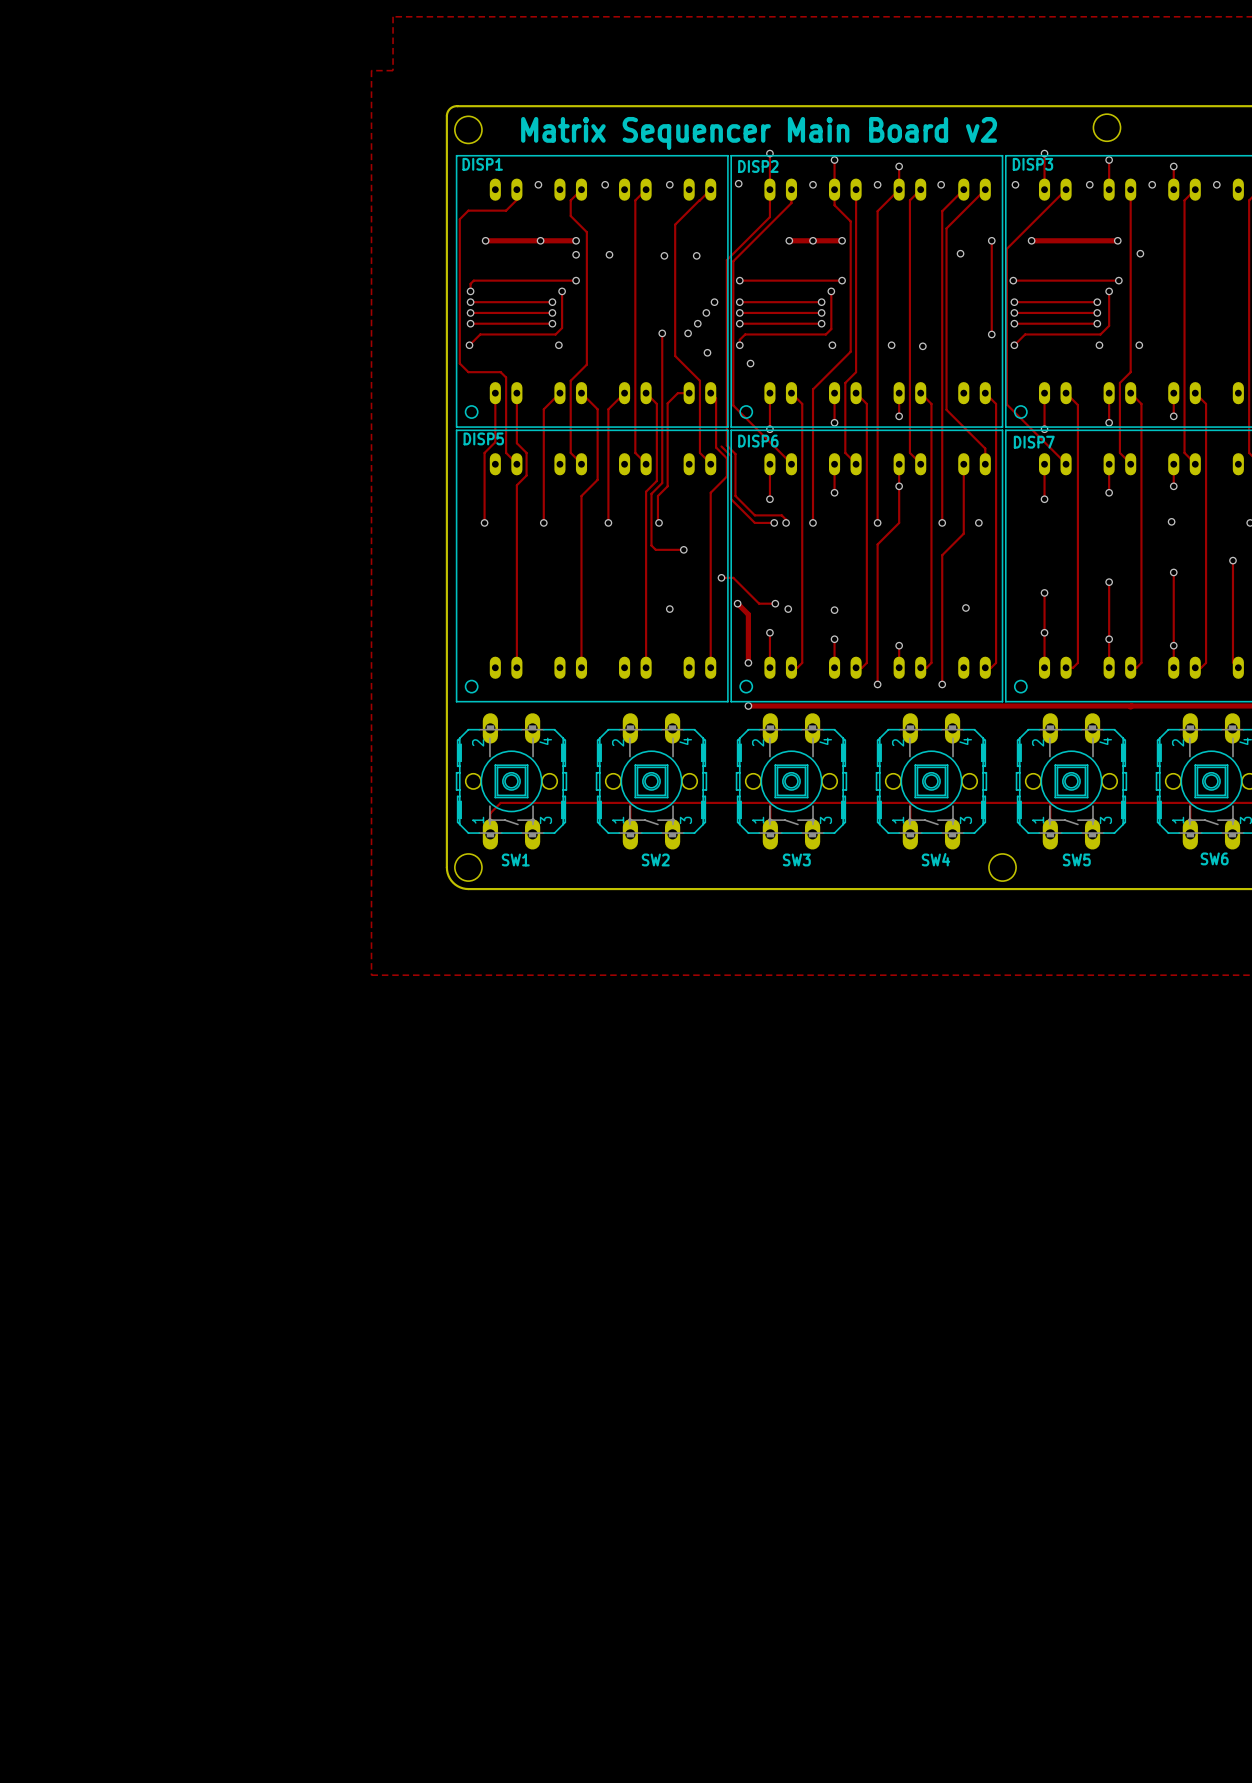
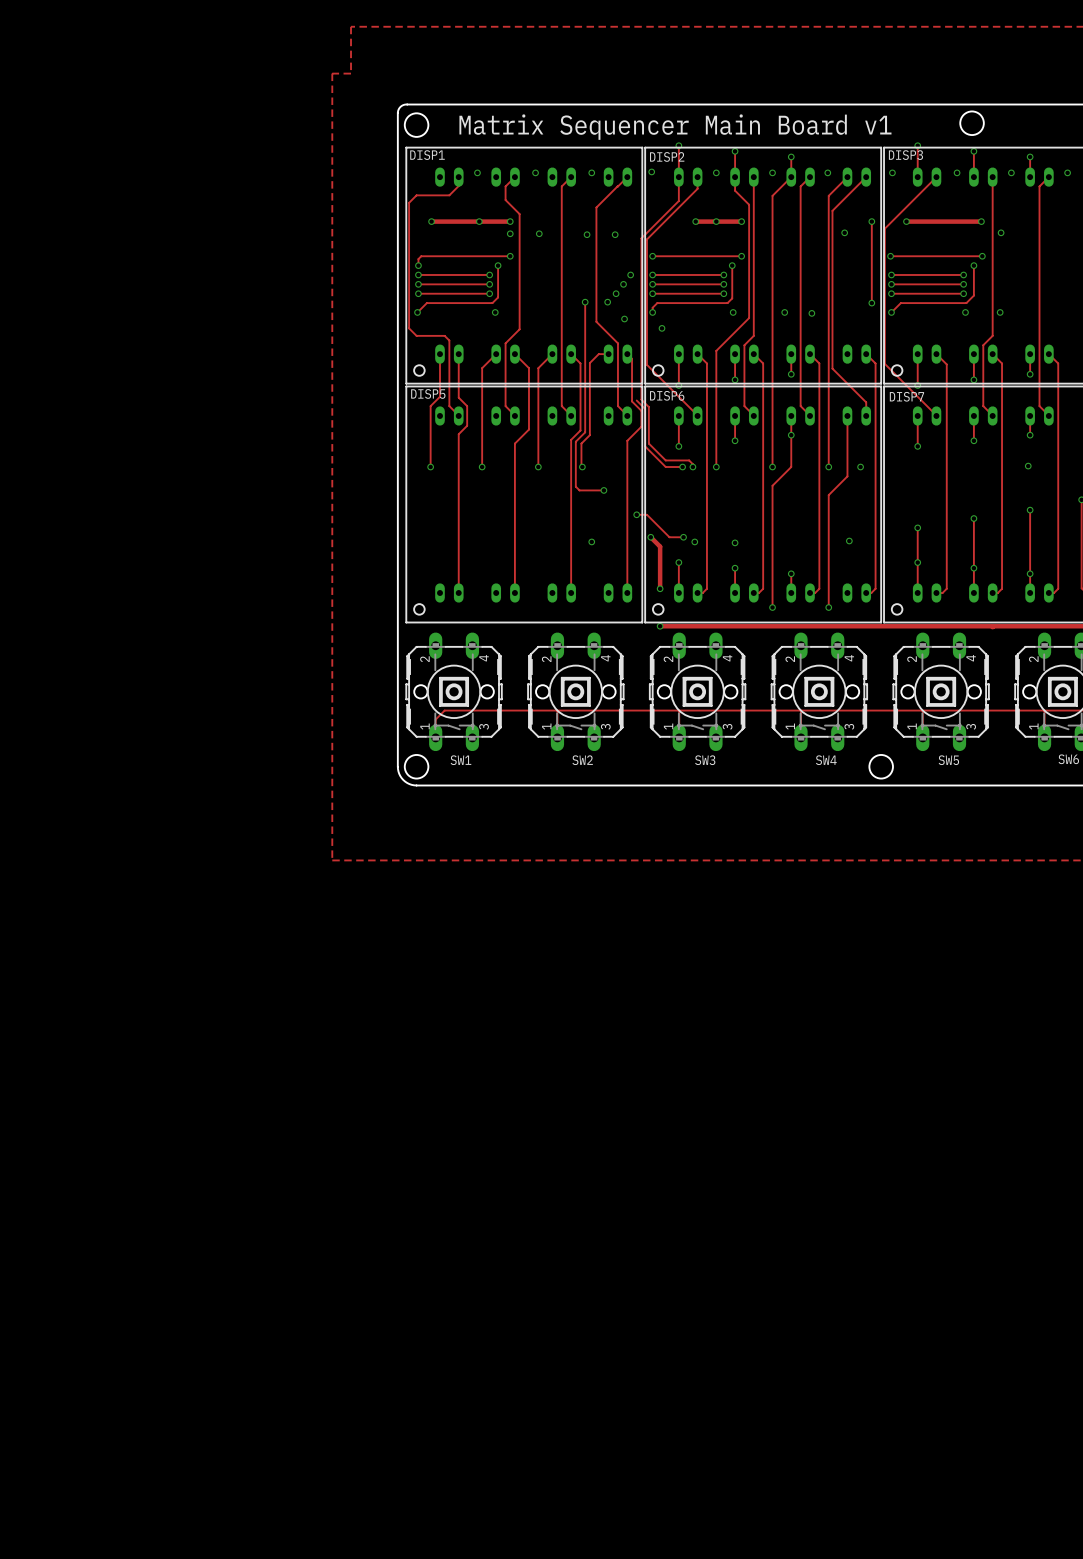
text: Matrix Sequencer Main Board v2 (759, 133) -> Matrix Sequencer Main Board v1 (675, 127)

